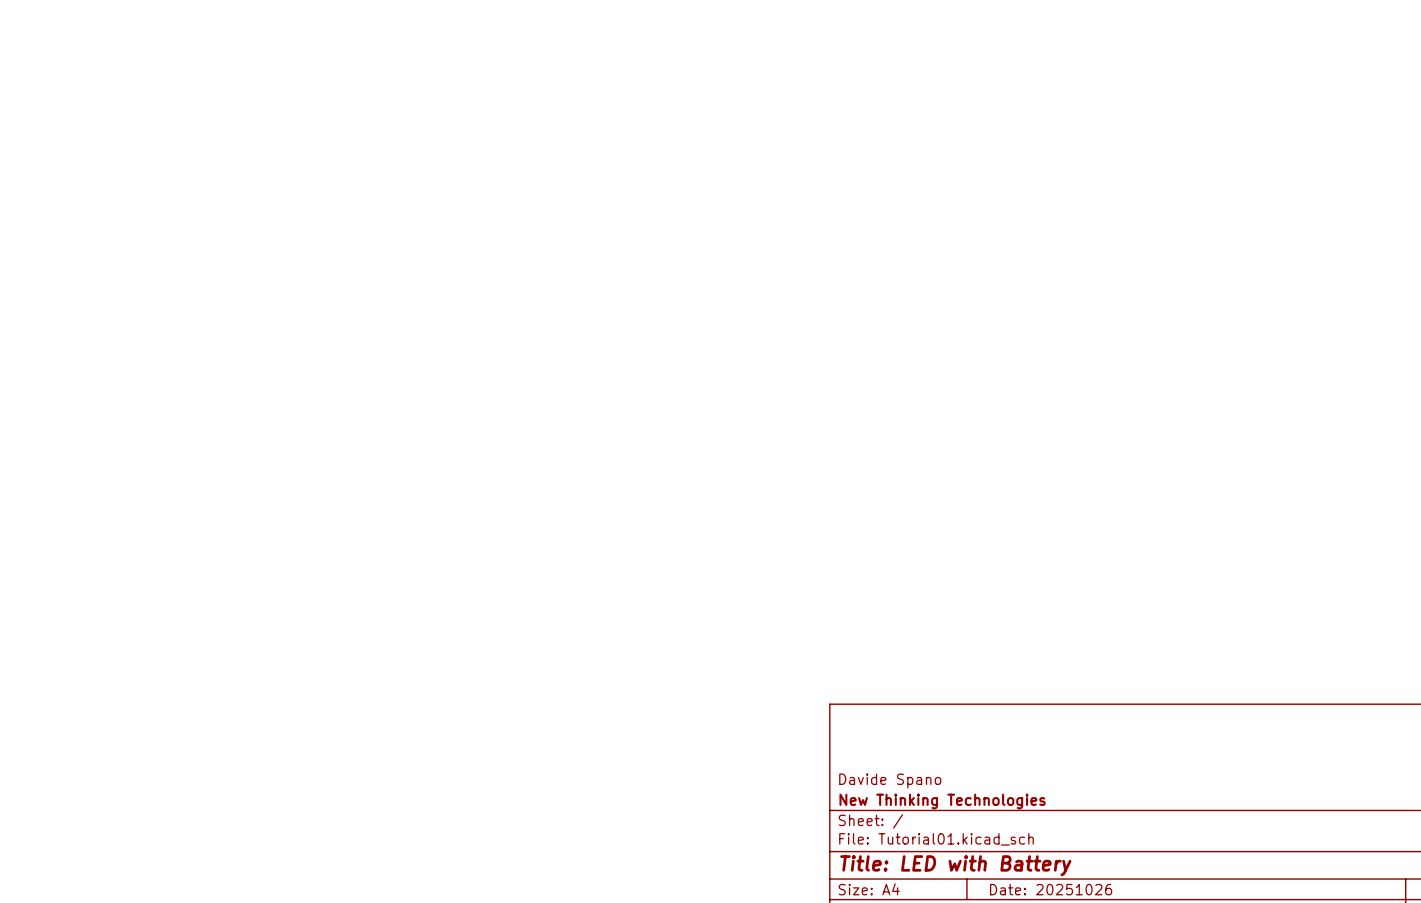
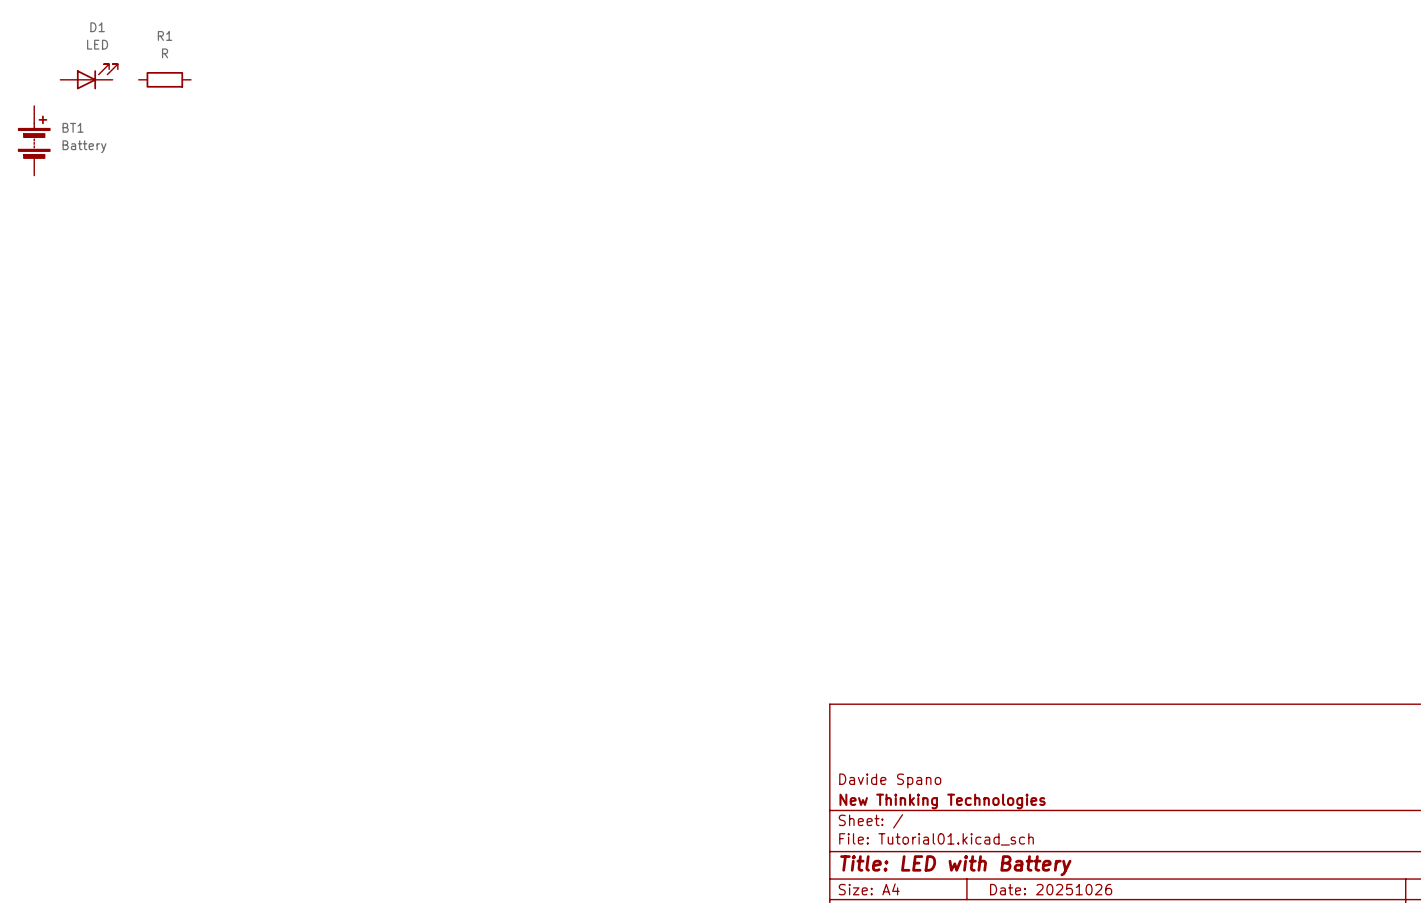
D1: none -> LED (89, 76)
R1: none -> R (164, 79)
BT1: none -> Battery (34, 140)

